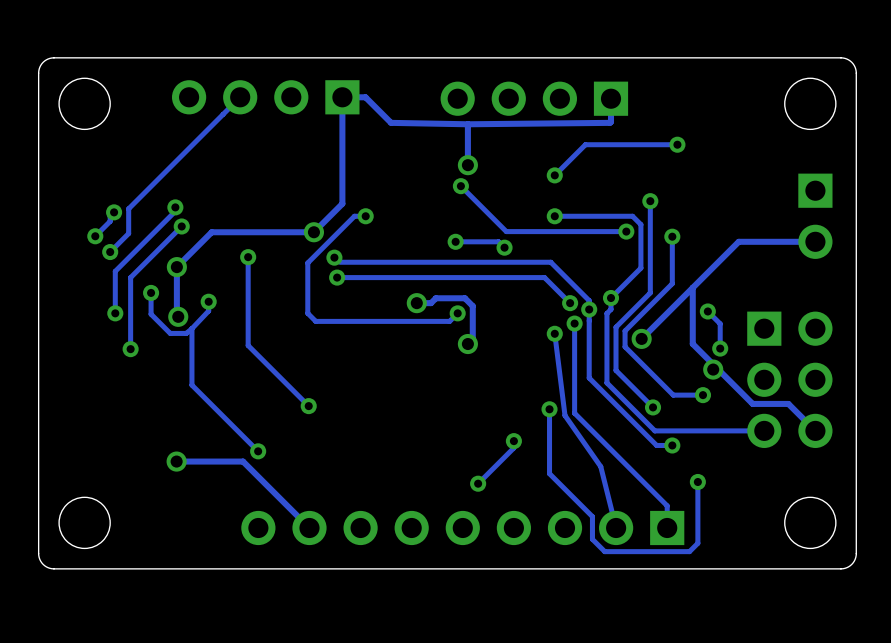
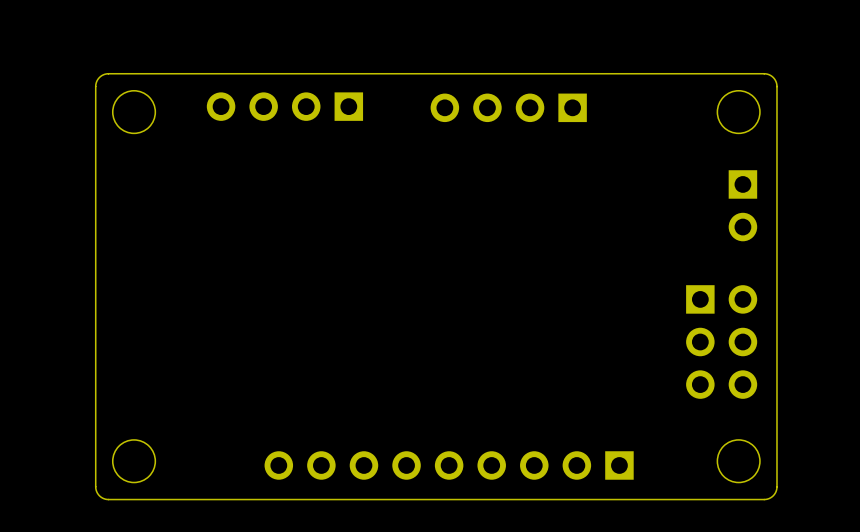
track: (240, 97) (128, 208) (128, 233) (110, 252) -> none
track: (611, 98) (609, 122) (467, 124) -> none
track: (467, 124) (467, 165) -> none
track: (467, 124) (391, 122) (365, 97) (342, 97) (342, 203) (313, 232) (211, 232) (176, 267) (178, 316) -> none
track: (677, 144) (585, 144) (554, 175) -> none
via: (677, 144) -> none
via: (467, 165) -> none
via: (554, 175) -> none
track: (460, 186) (506, 231) (626, 231) -> none
via: (460, 186) -> none
track: (650, 201) (650, 292) (616, 327) (616, 370) (653, 407) -> none
via: (650, 201) -> none
track: (175, 207) (175, 211) (115, 271) (115, 313) -> none
via: (175, 207) -> none
track: (114, 212) (110, 216) (110, 221) (95, 236) -> none
via: (114, 212) -> none
track: (365, 216) (354, 216) (307, 262) (307, 313) (315, 321) (449, 321) (457, 313) -> none
via: (365, 216) -> none
track: (554, 216) (632, 216) (640, 224) (640, 268) (611, 298) (611, 309) (606, 313) (606, 382) (654, 430) (764, 430) -> none
via: (554, 216) -> none
track: (181, 226) (130, 277) (130, 349) -> none
via: (181, 226) -> none
via: (626, 231) -> none
via: (313, 232) -> none
via: (95, 236) -> none
track: (672, 236) (672, 283) (625, 330) (625, 346) (673, 395) (702, 395) -> none
via: (672, 236) -> none
track: (455, 241) (498, 241) (504, 247) -> none
via: (455, 241) -> none
track: (815, 241) (738, 241) (641, 338) -> none
via: (504, 247) -> none
via: (110, 252) -> none
track: (248, 257) (248, 345) (308, 406) -> none
via: (248, 257) -> none
via: (334, 257) -> none
track: (340, 262) (550, 262) (589, 300) (589, 378) (656, 445) (672, 445) -> none
via: (176, 267) -> none
track: (337, 277) (544, 277) (570, 303) -> none
via: (337, 277) -> none
track: (692, 287) (692, 343) (752, 403) (788, 403) (815, 430) -> none
track: (151, 292) (151, 314) (170, 333) (186, 333) (191, 328) -> none
via: (151, 292) -> none
via: (611, 298) -> none
track: (208, 301) (208, 310) (191, 328) -> none
via: (208, 301) -> none
track: (416, 303) (431, 303) (435, 298) (464, 298) (472, 306) (472, 339) (467, 344) -> none
via: (416, 303) -> none
via: (570, 303) -> none
via: (589, 309) -> none
track: (707, 311) (720, 323) (720, 348) -> none
via: (707, 311) -> none
via: (115, 313) -> none
via: (457, 313) -> none
via: (178, 316) -> none
track: (574, 323) (574, 413) (667, 505) (667, 527) -> none
via: (574, 323) -> none
track: (191, 328) (191, 385) (258, 451) -> none
track: (554, 333) (565, 415) (600, 466) (616, 527) -> none
via: (554, 333) -> none
via: (641, 338) -> none
via: (467, 344) -> none
via: (720, 348) -> none
via: (130, 349) -> none
via: (713, 369) -> none
via: (702, 395) -> none
via: (308, 406) -> none
via: (653, 407) -> none
track: (549, 409) (549, 473) (592, 516) (592, 539) (604, 551) (689, 551) (697, 543) (697, 482) -> none
via: (549, 409) -> none
track: (513, 441) (513, 447) (478, 483) -> none
via: (513, 441) -> none
via: (672, 445) -> none
via: (258, 451) -> none
track: (176, 461) (243, 461) (309, 527) -> none
via: (176, 461) -> none
via: (697, 482) -> none
via: (478, 483) -> none

